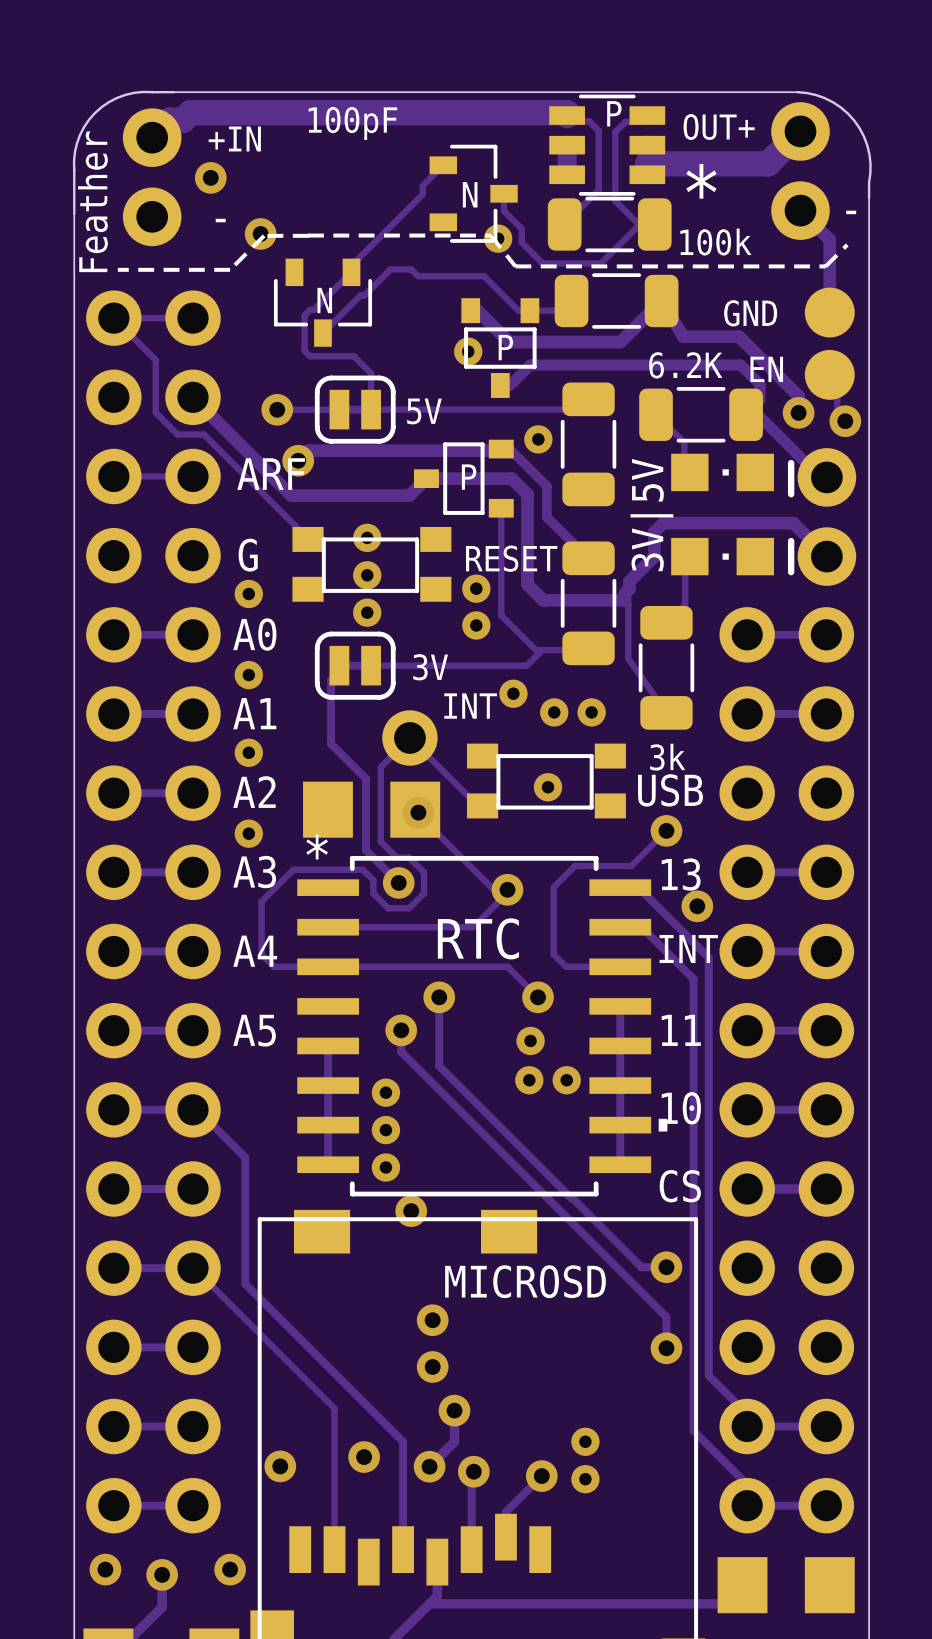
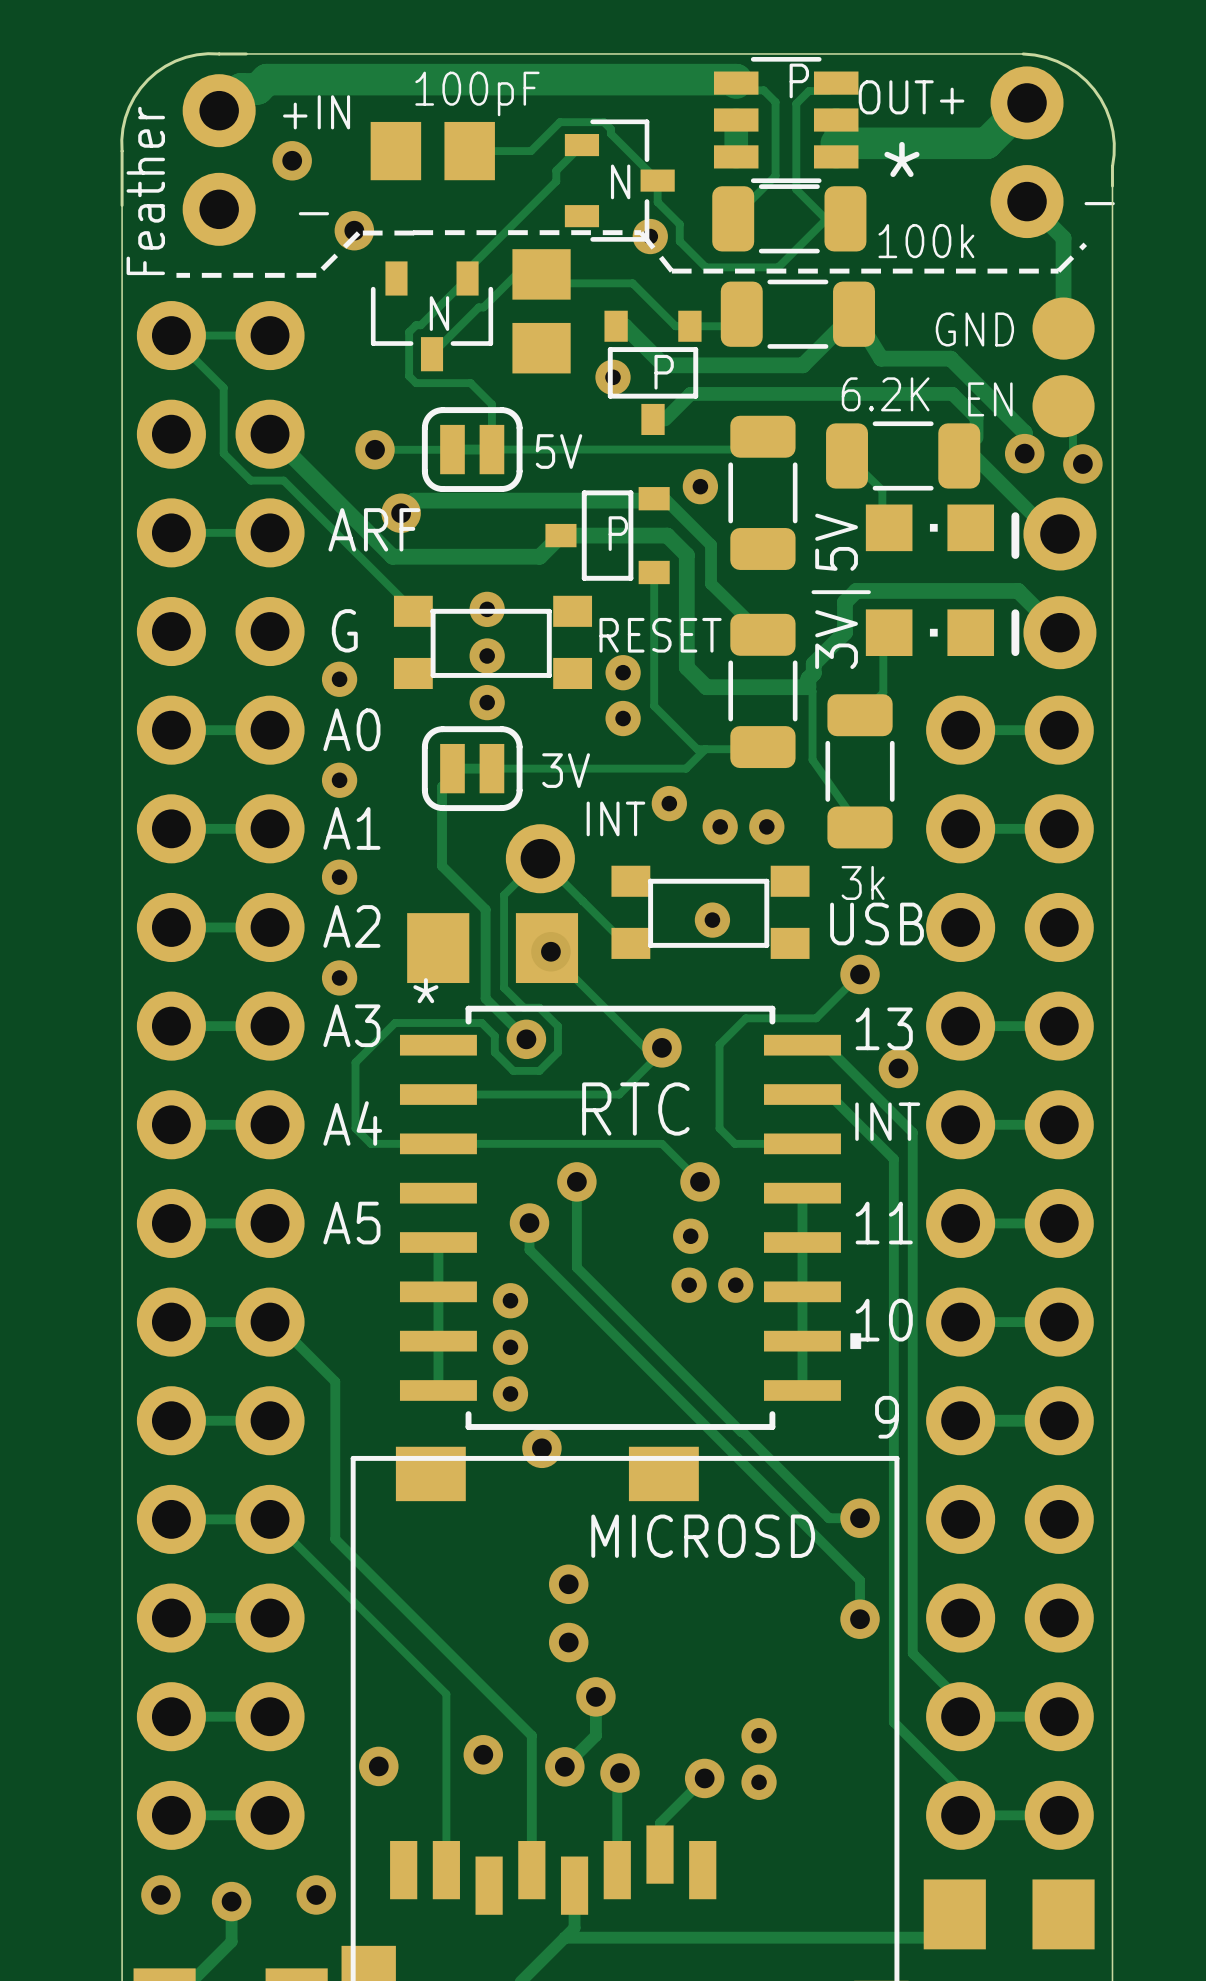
part: none -> (432, 151)
track: none -> (469, 151) (531, 151) (559, 122) (603, 122) (610, 129) (610, 133) (657, 180)
part: none -> (541, 311)
text: CS (680, 1186) -> 9 (886, 1417)

